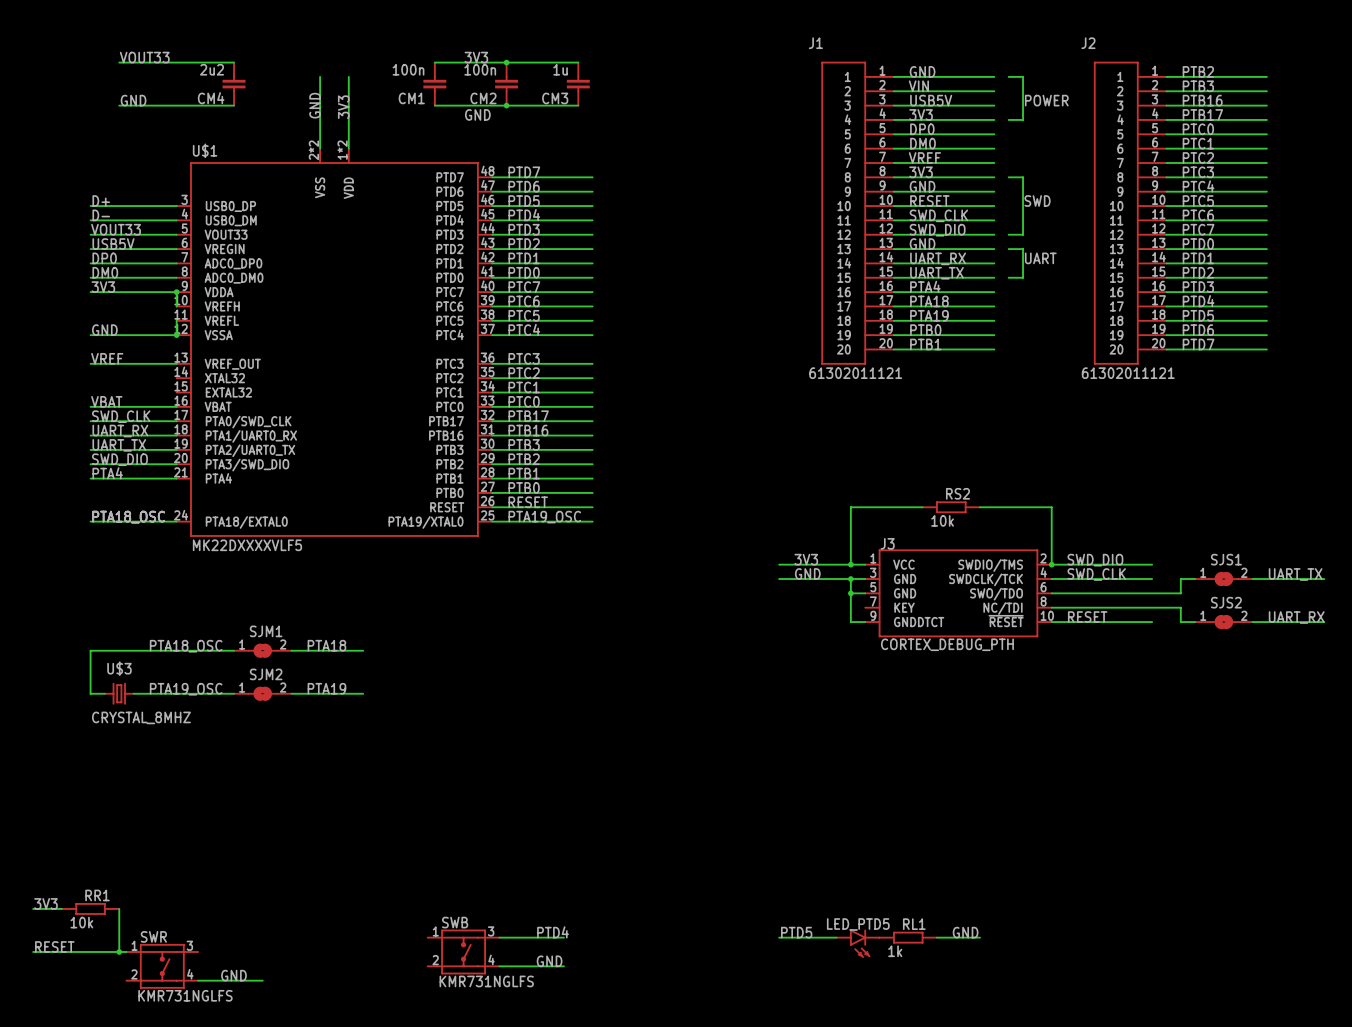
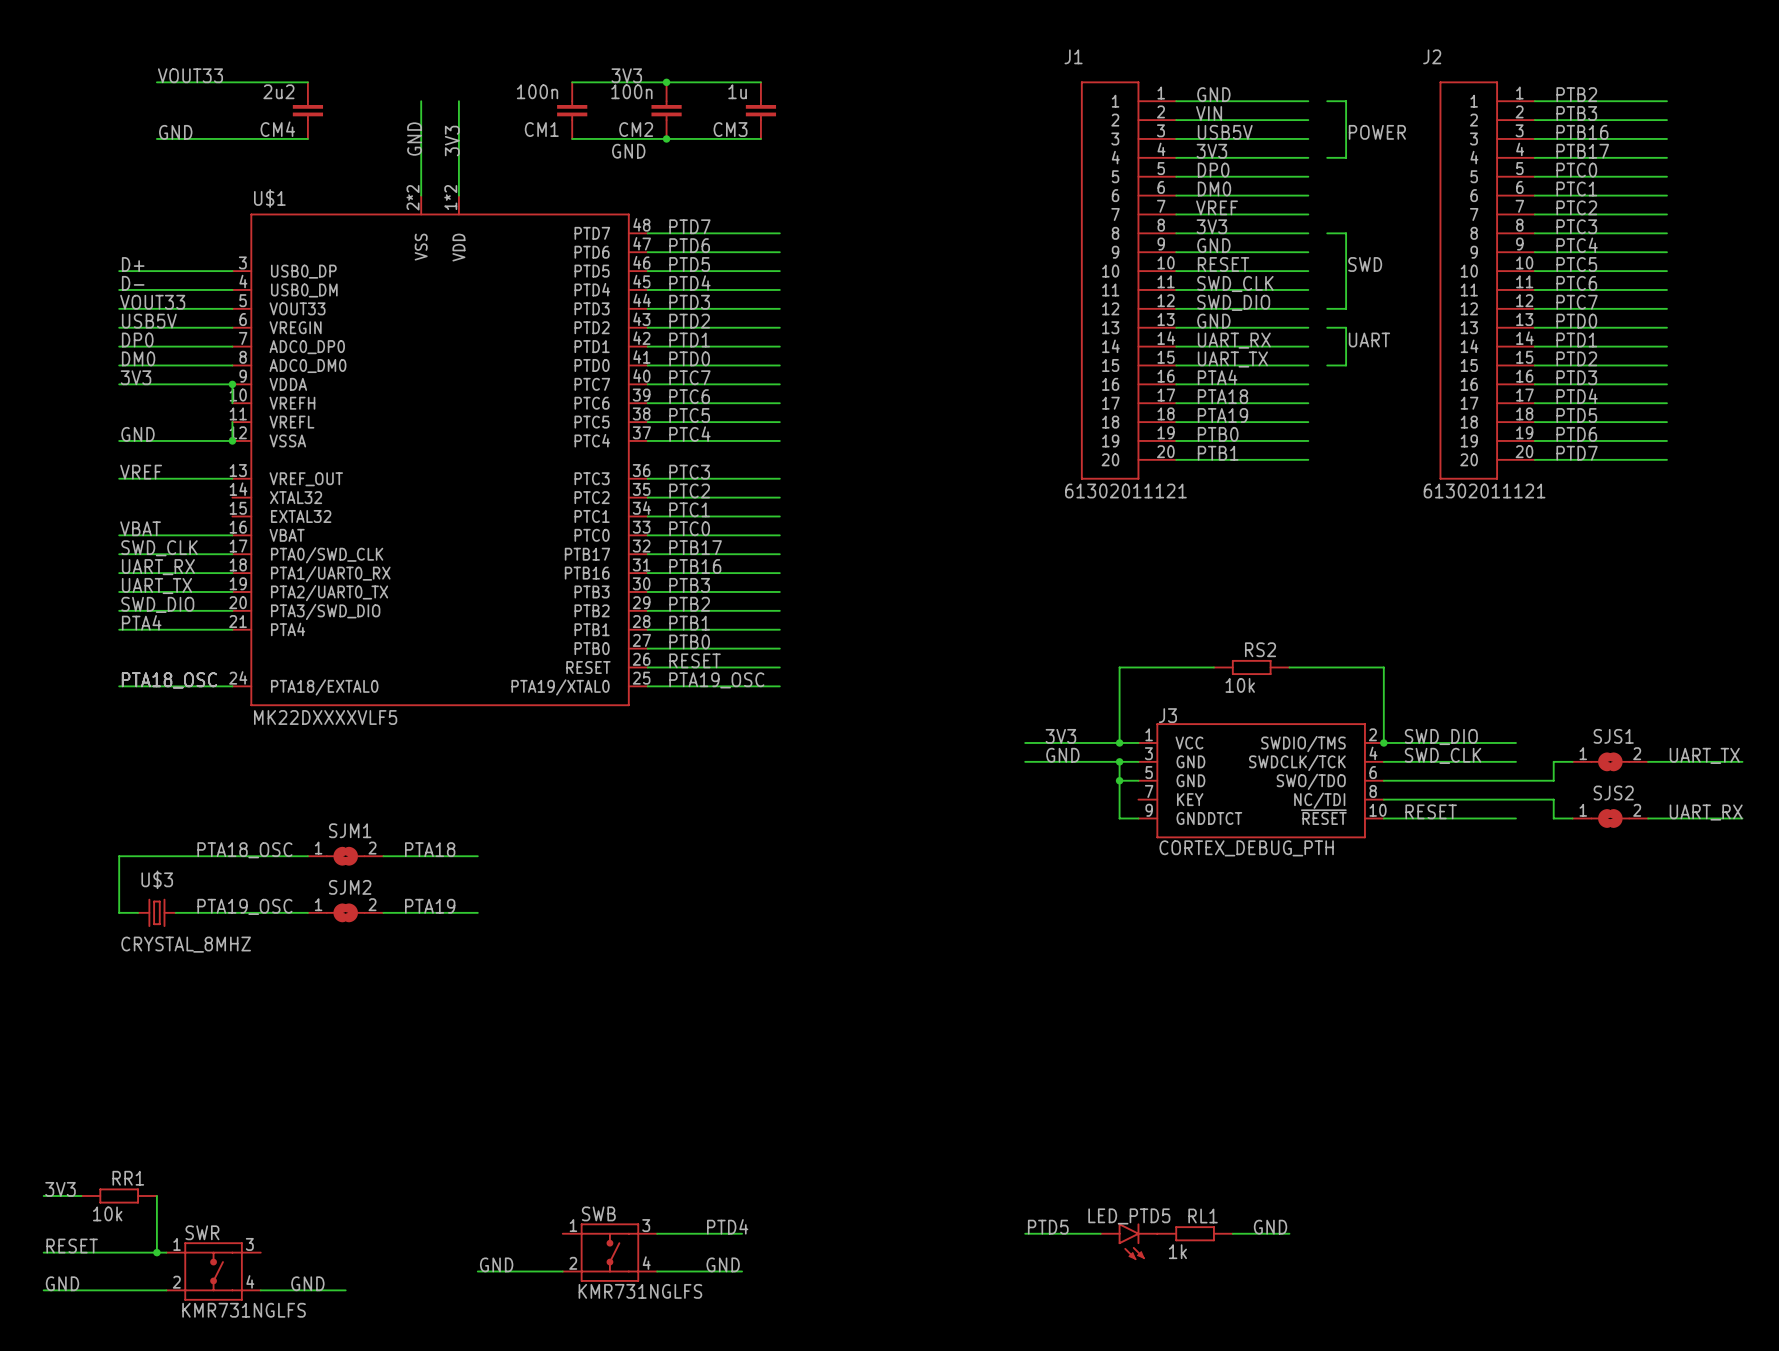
label: none -> GND (496, 1264)
wire: none -> (477, 1271) (562, 1271)
label: none -> GND (62, 1283)
wire: none -> (43, 1290) (166, 1290)

